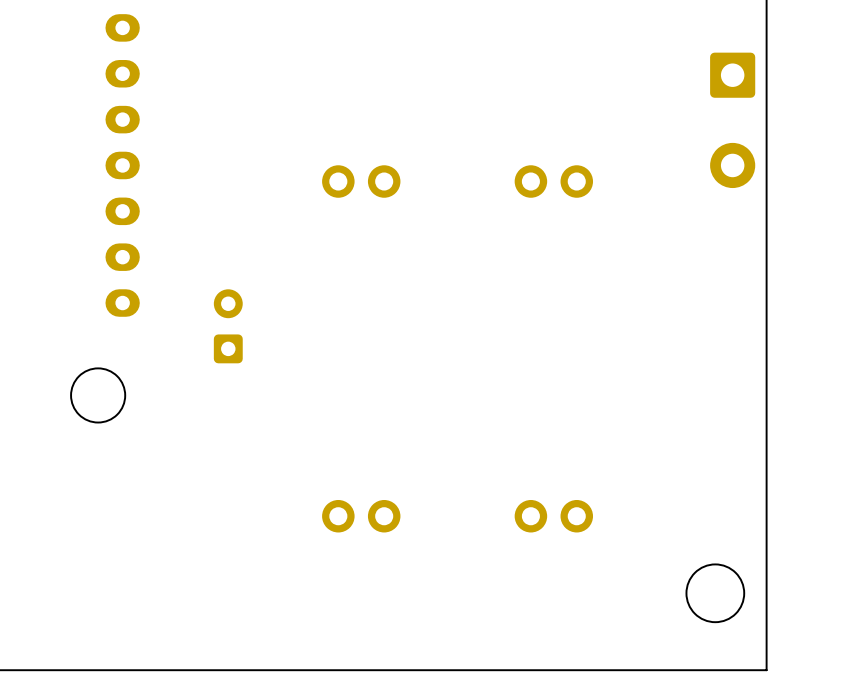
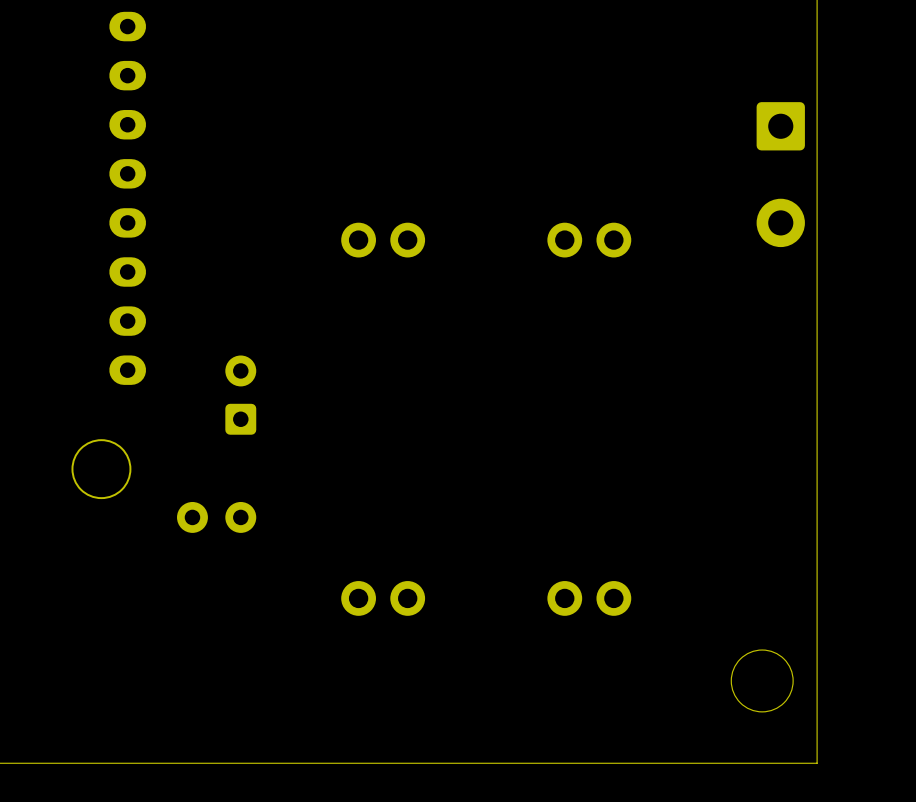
part: none -> (216, 517)

